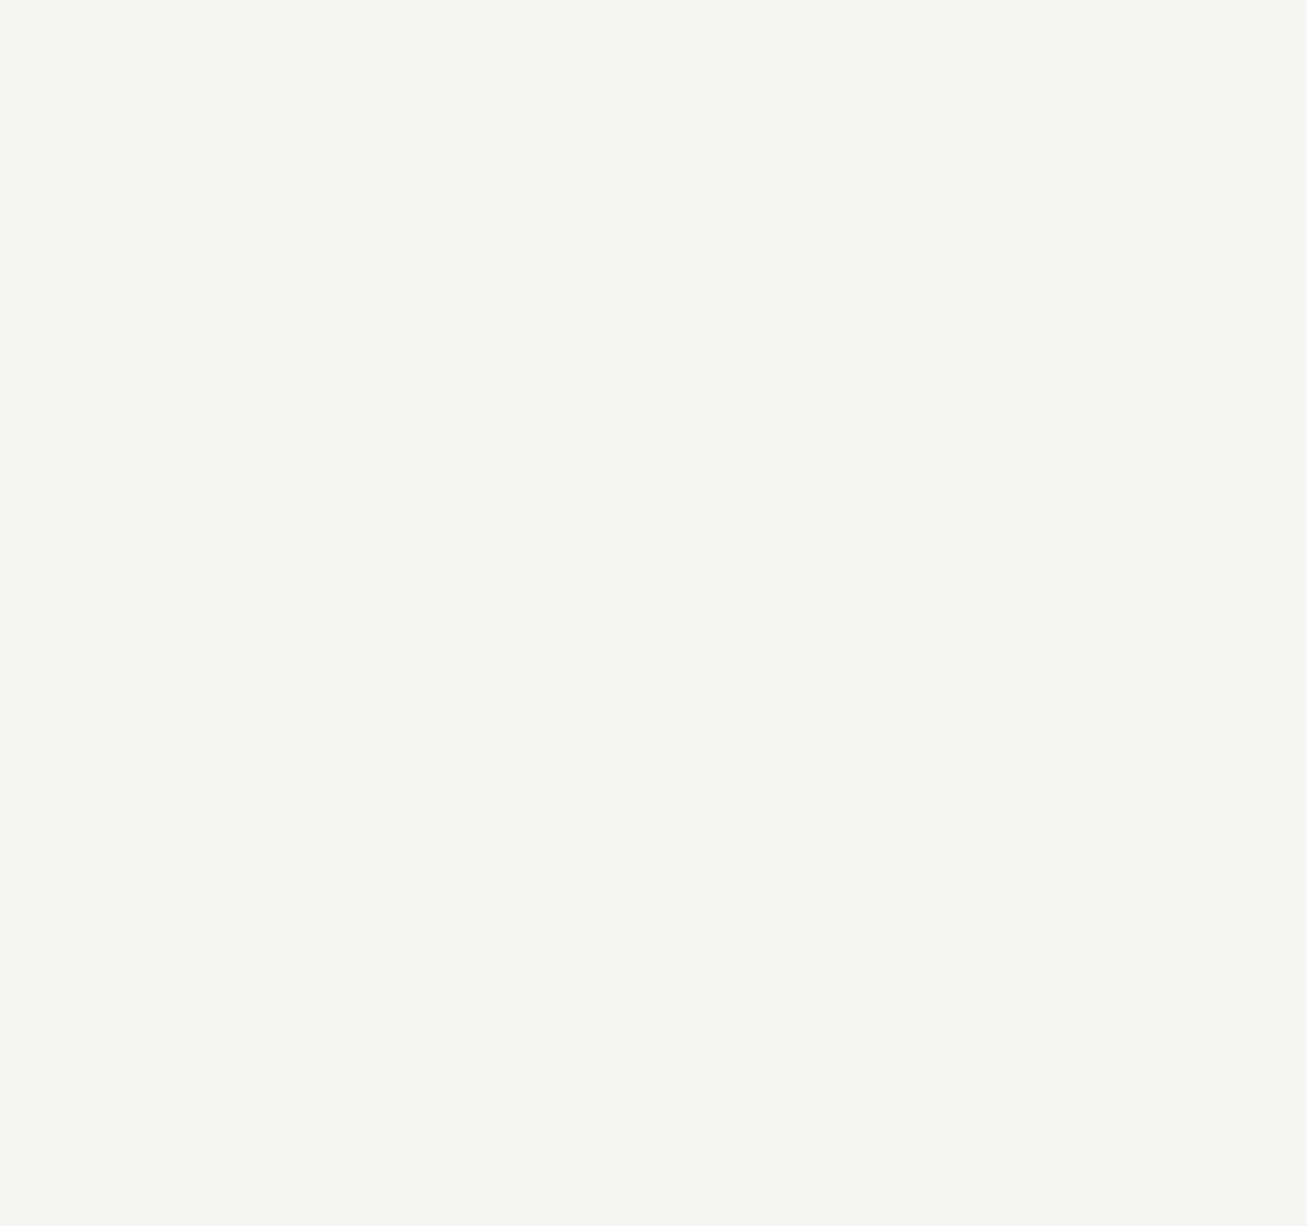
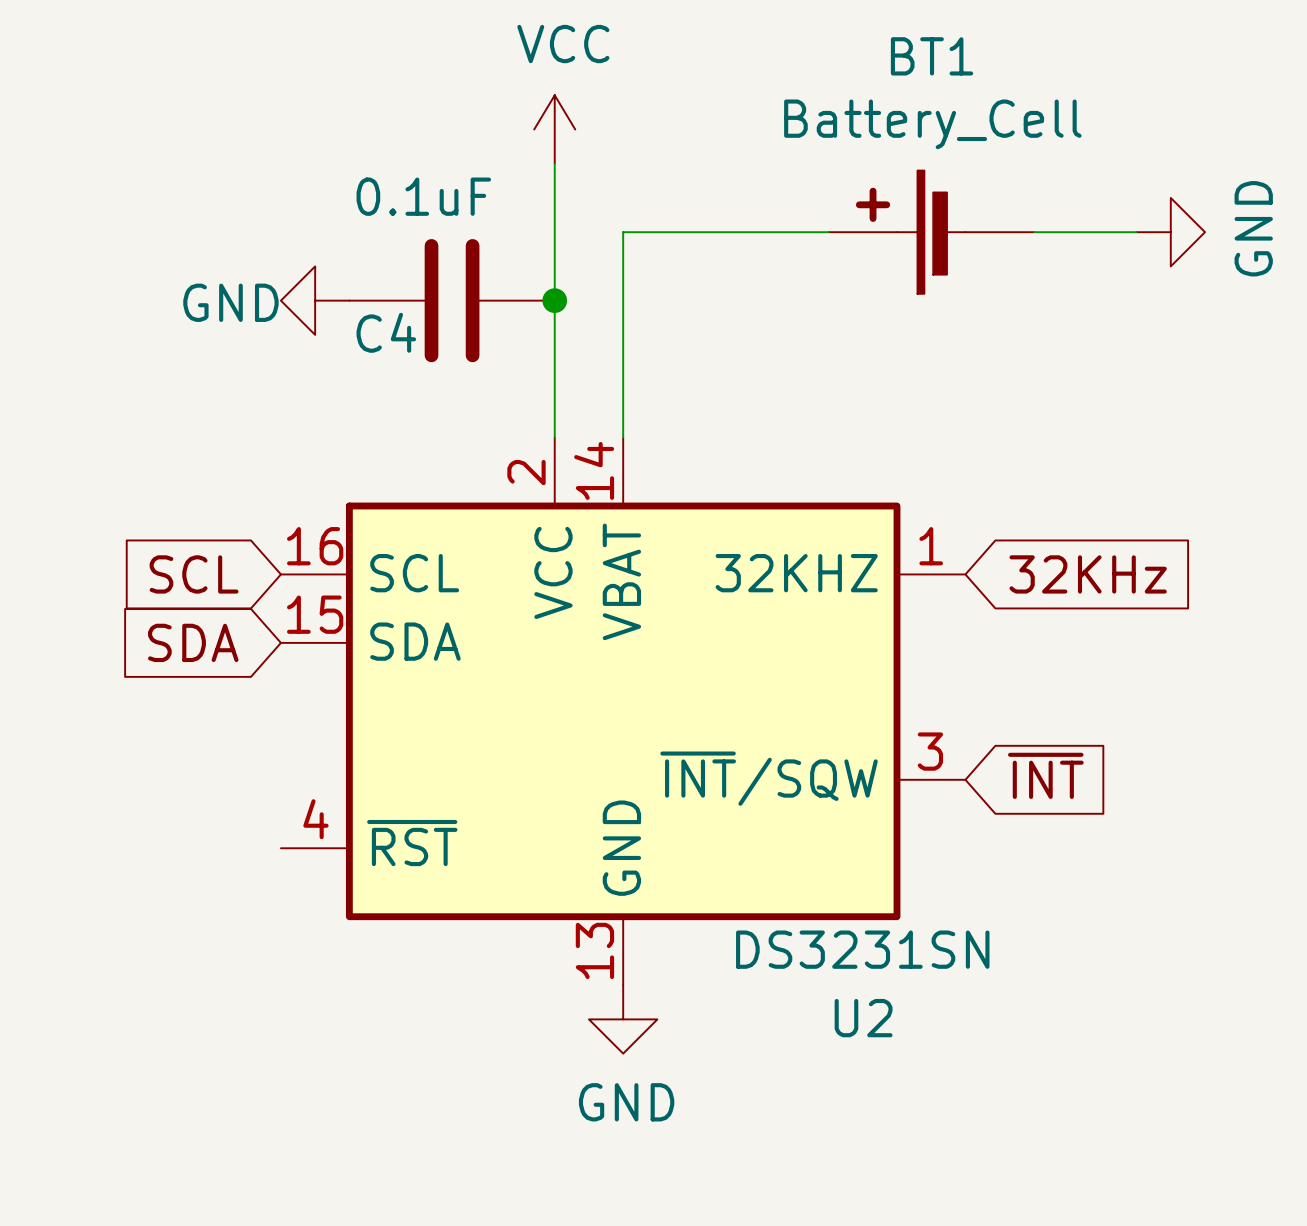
power symbol: none -> VCC (554, 129)
wire: none -> (554, 163) (554, 437)
wire: none -> (828, 232) (623, 232) (623, 437)
BT1: none -> Battery_Cell (931, 232)
wire: none -> (1033, 232) (1136, 232)
power symbol: none -> GND (1170, 232)
power symbol: none -> GND (315, 300)
C4: none -> 0.1uF (452, 300)
junction: none -> (554, 300)
global label: none -> SCL (194, 574)
global label: none -> 32KHz (1088, 574)
global label: none -> SDA (193, 642)
U2: none -> DS3231SN (623, 711)
global label: none -> ~{INT} (1045, 775)
power symbol: none -> GND (623, 1019)

